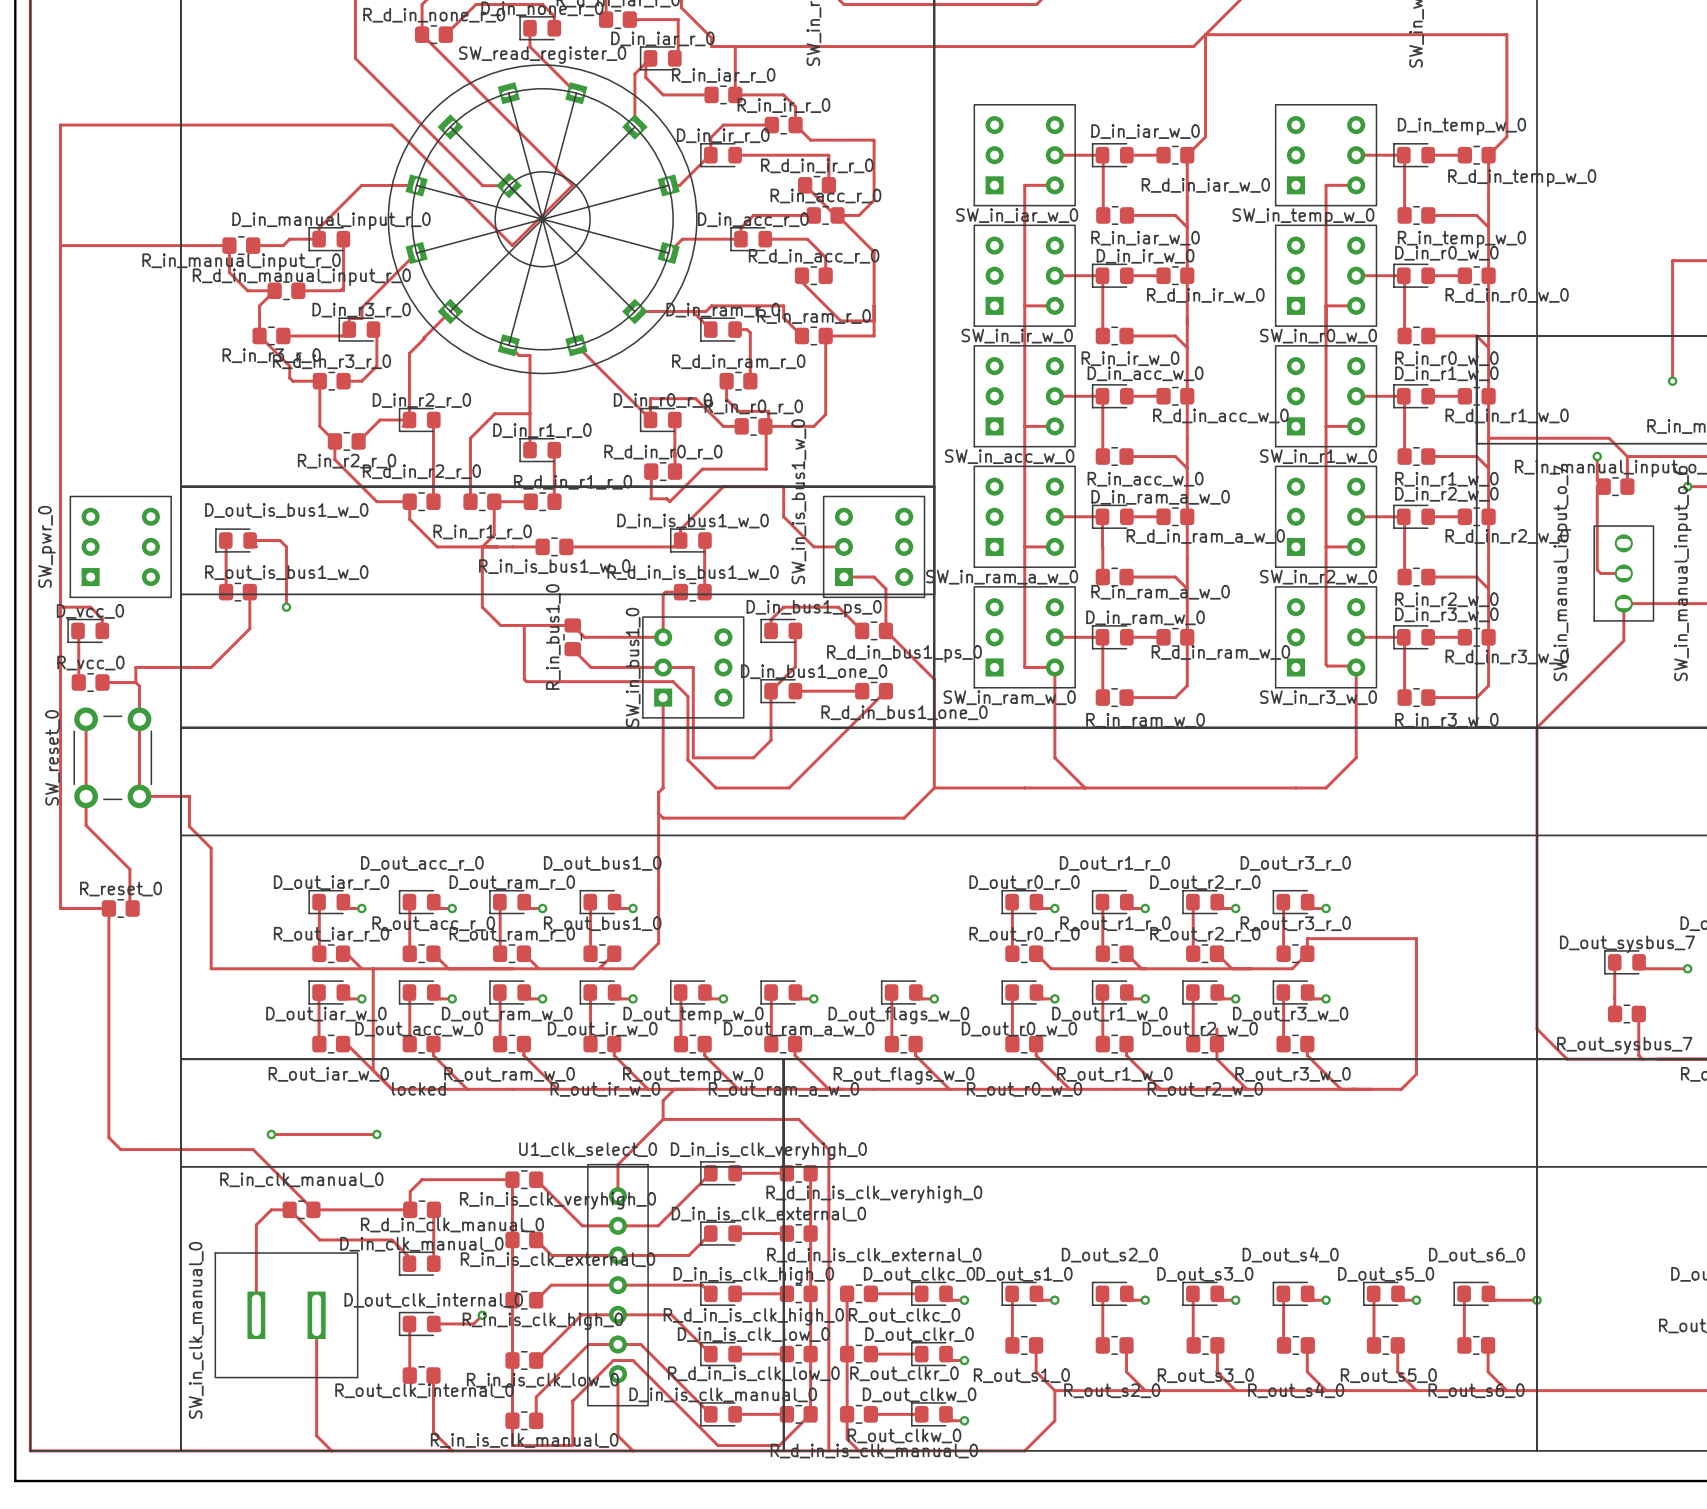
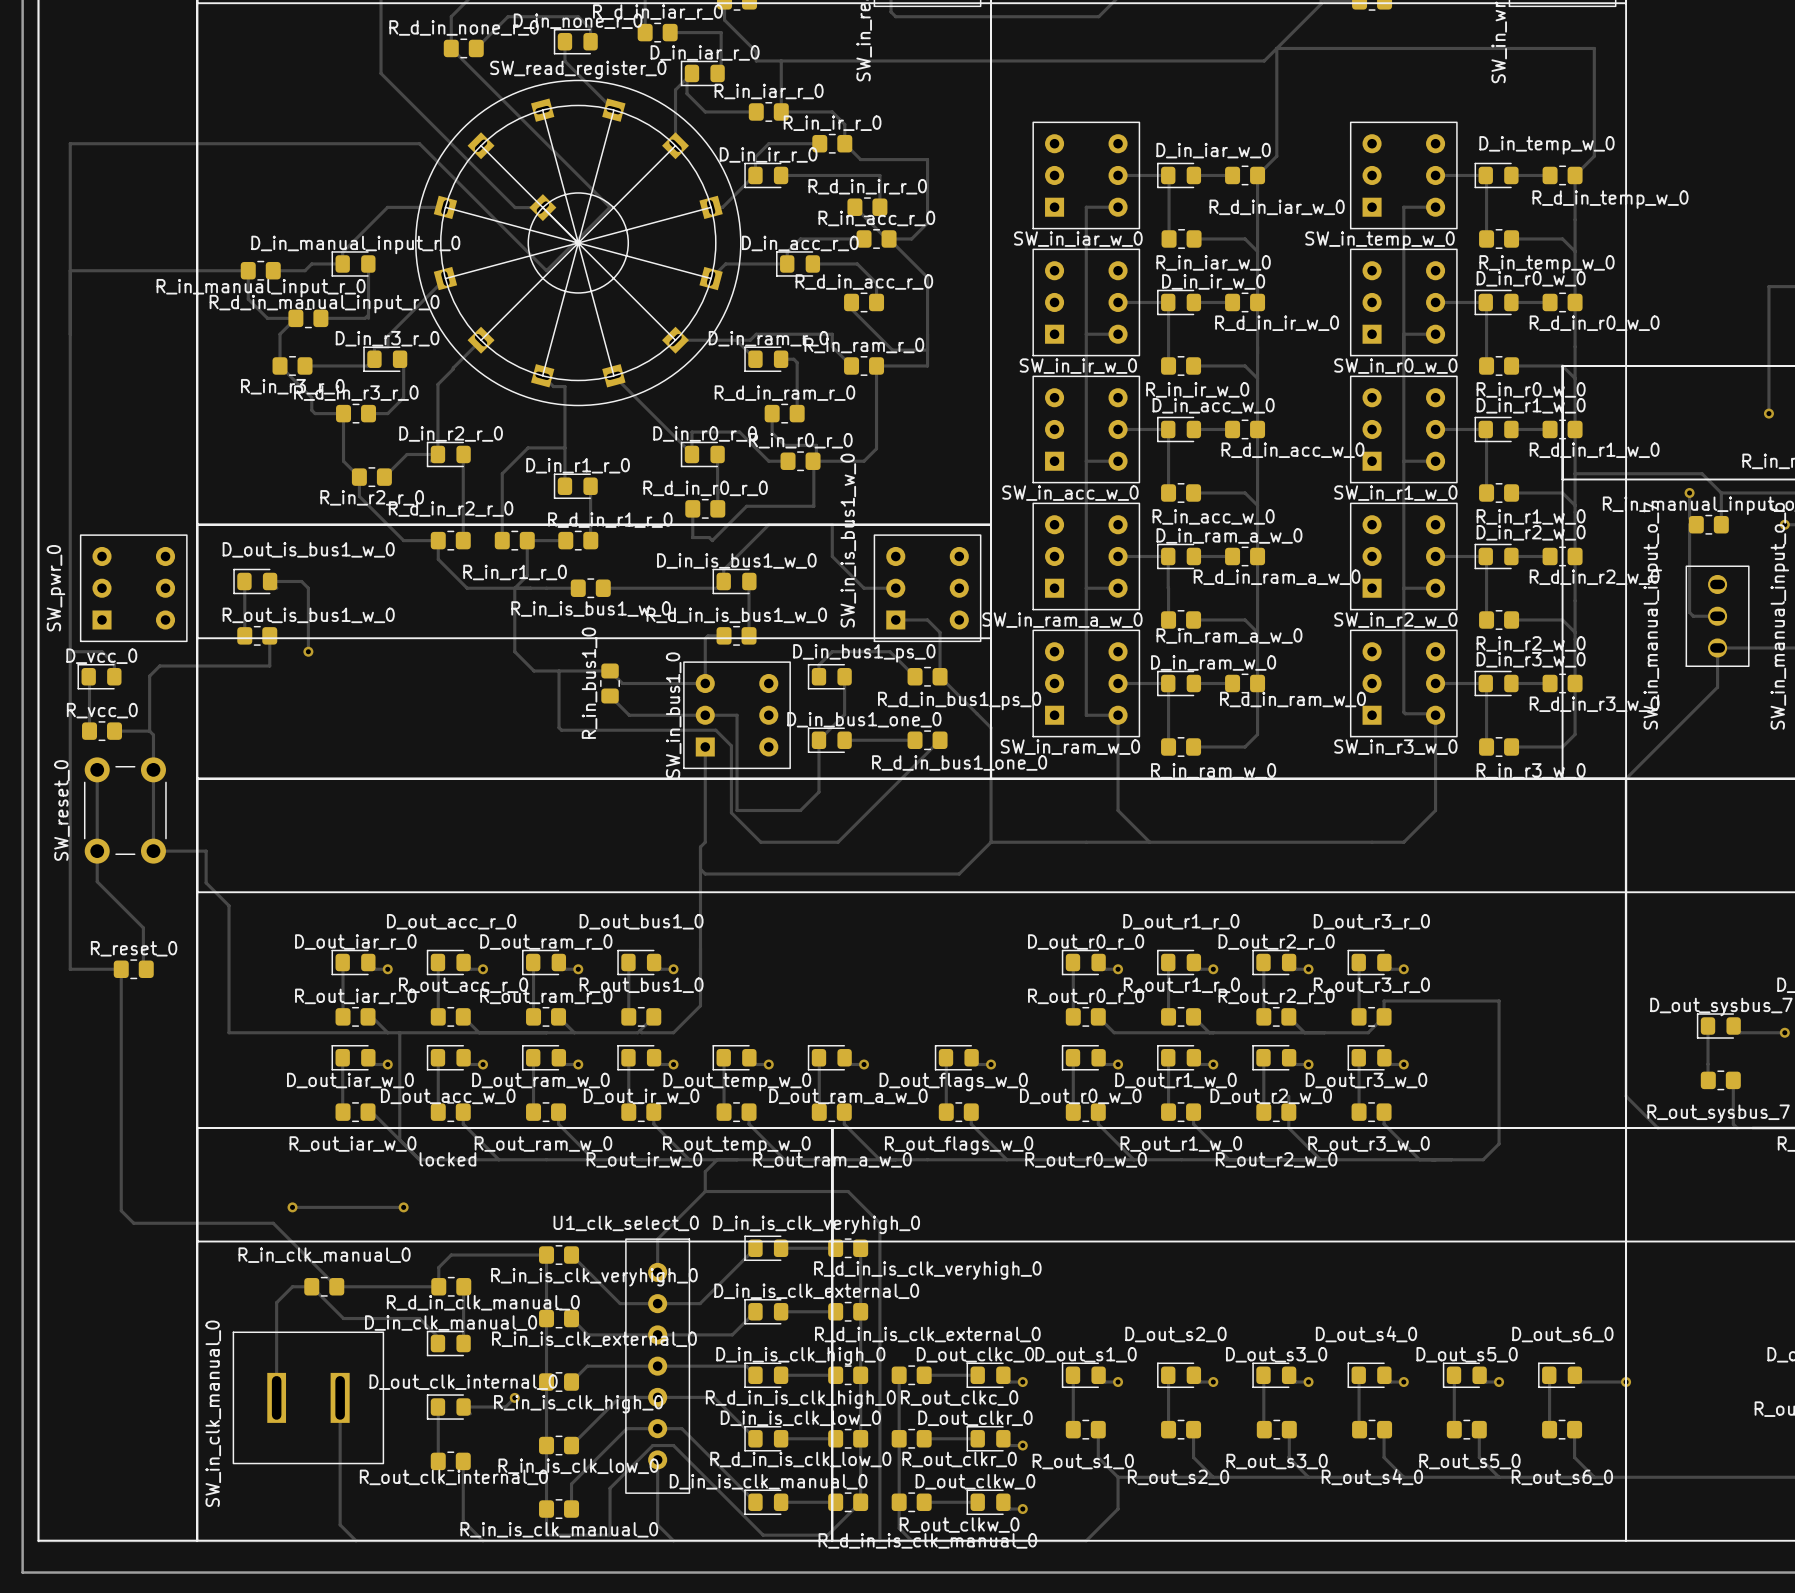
track: (249, 620) (249, 628) (211, 667) (135, 667) -> (269, 665) (159, 665) (149, 676) (149, 715)

